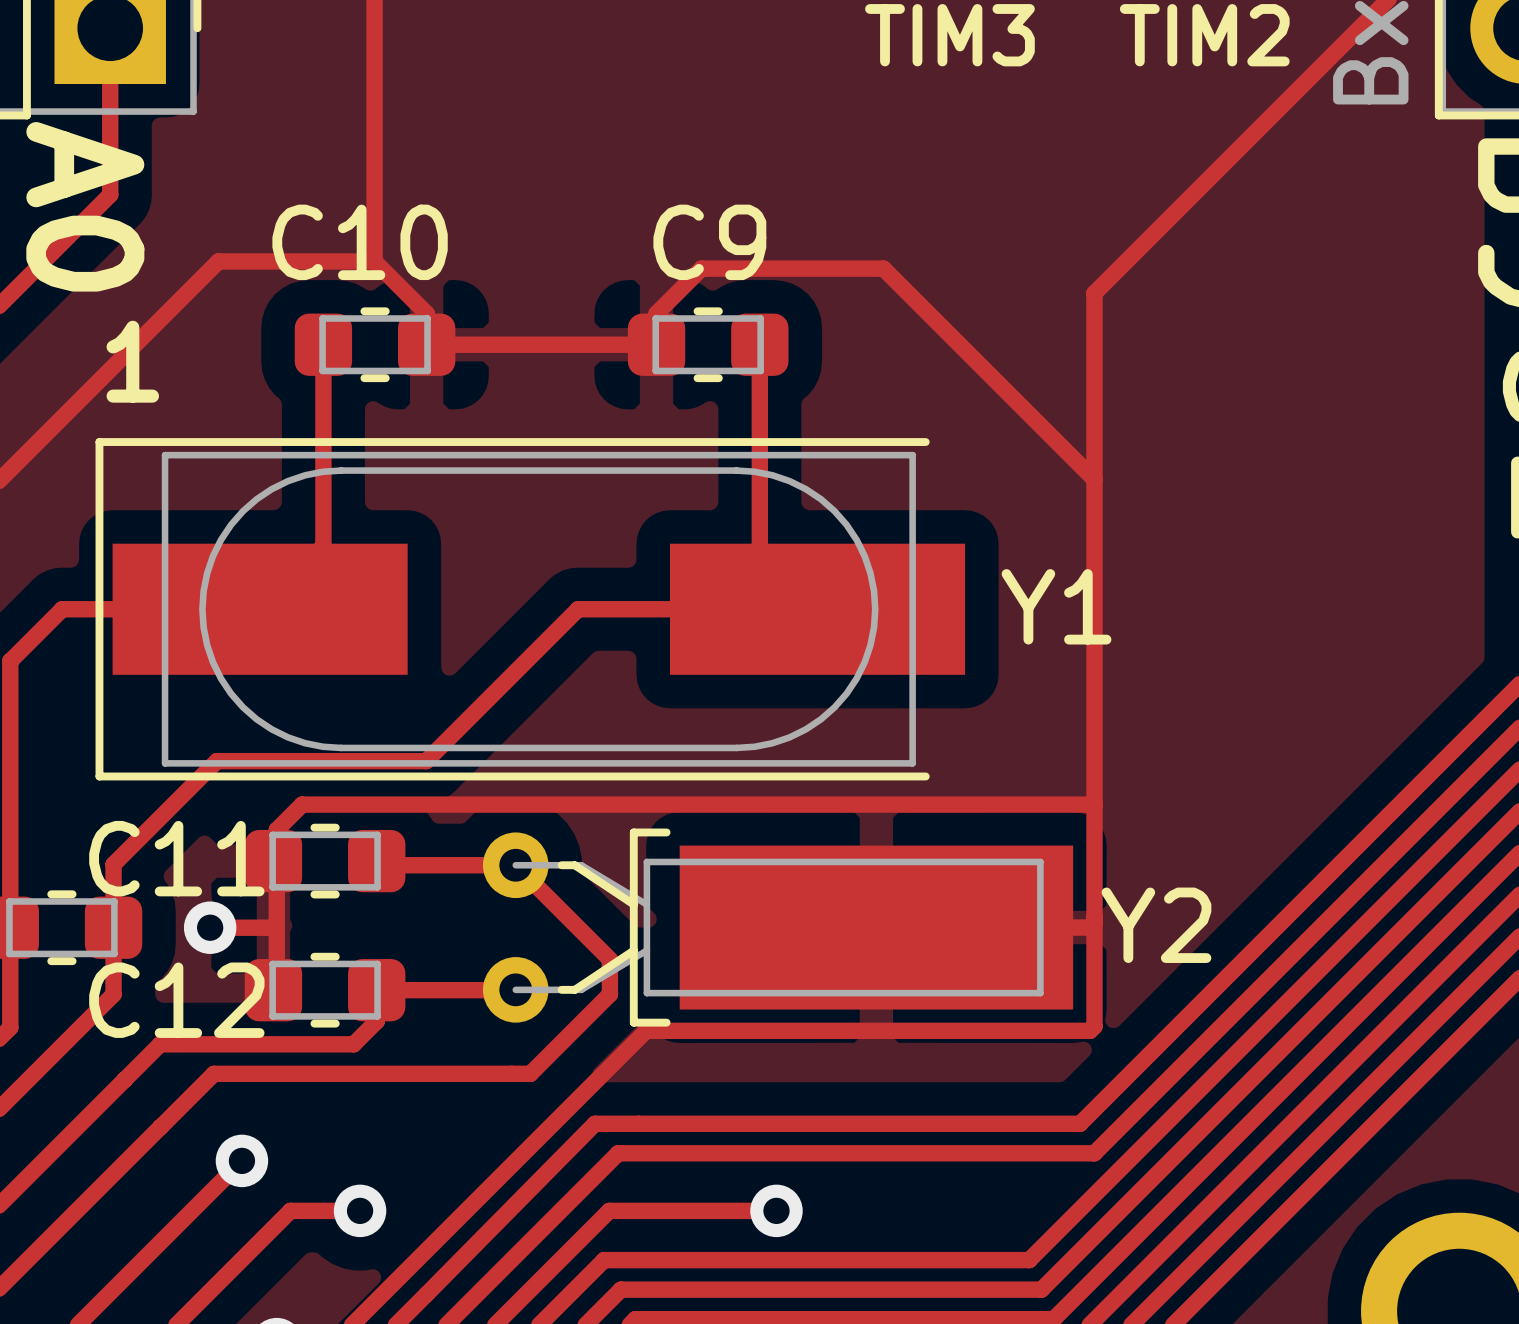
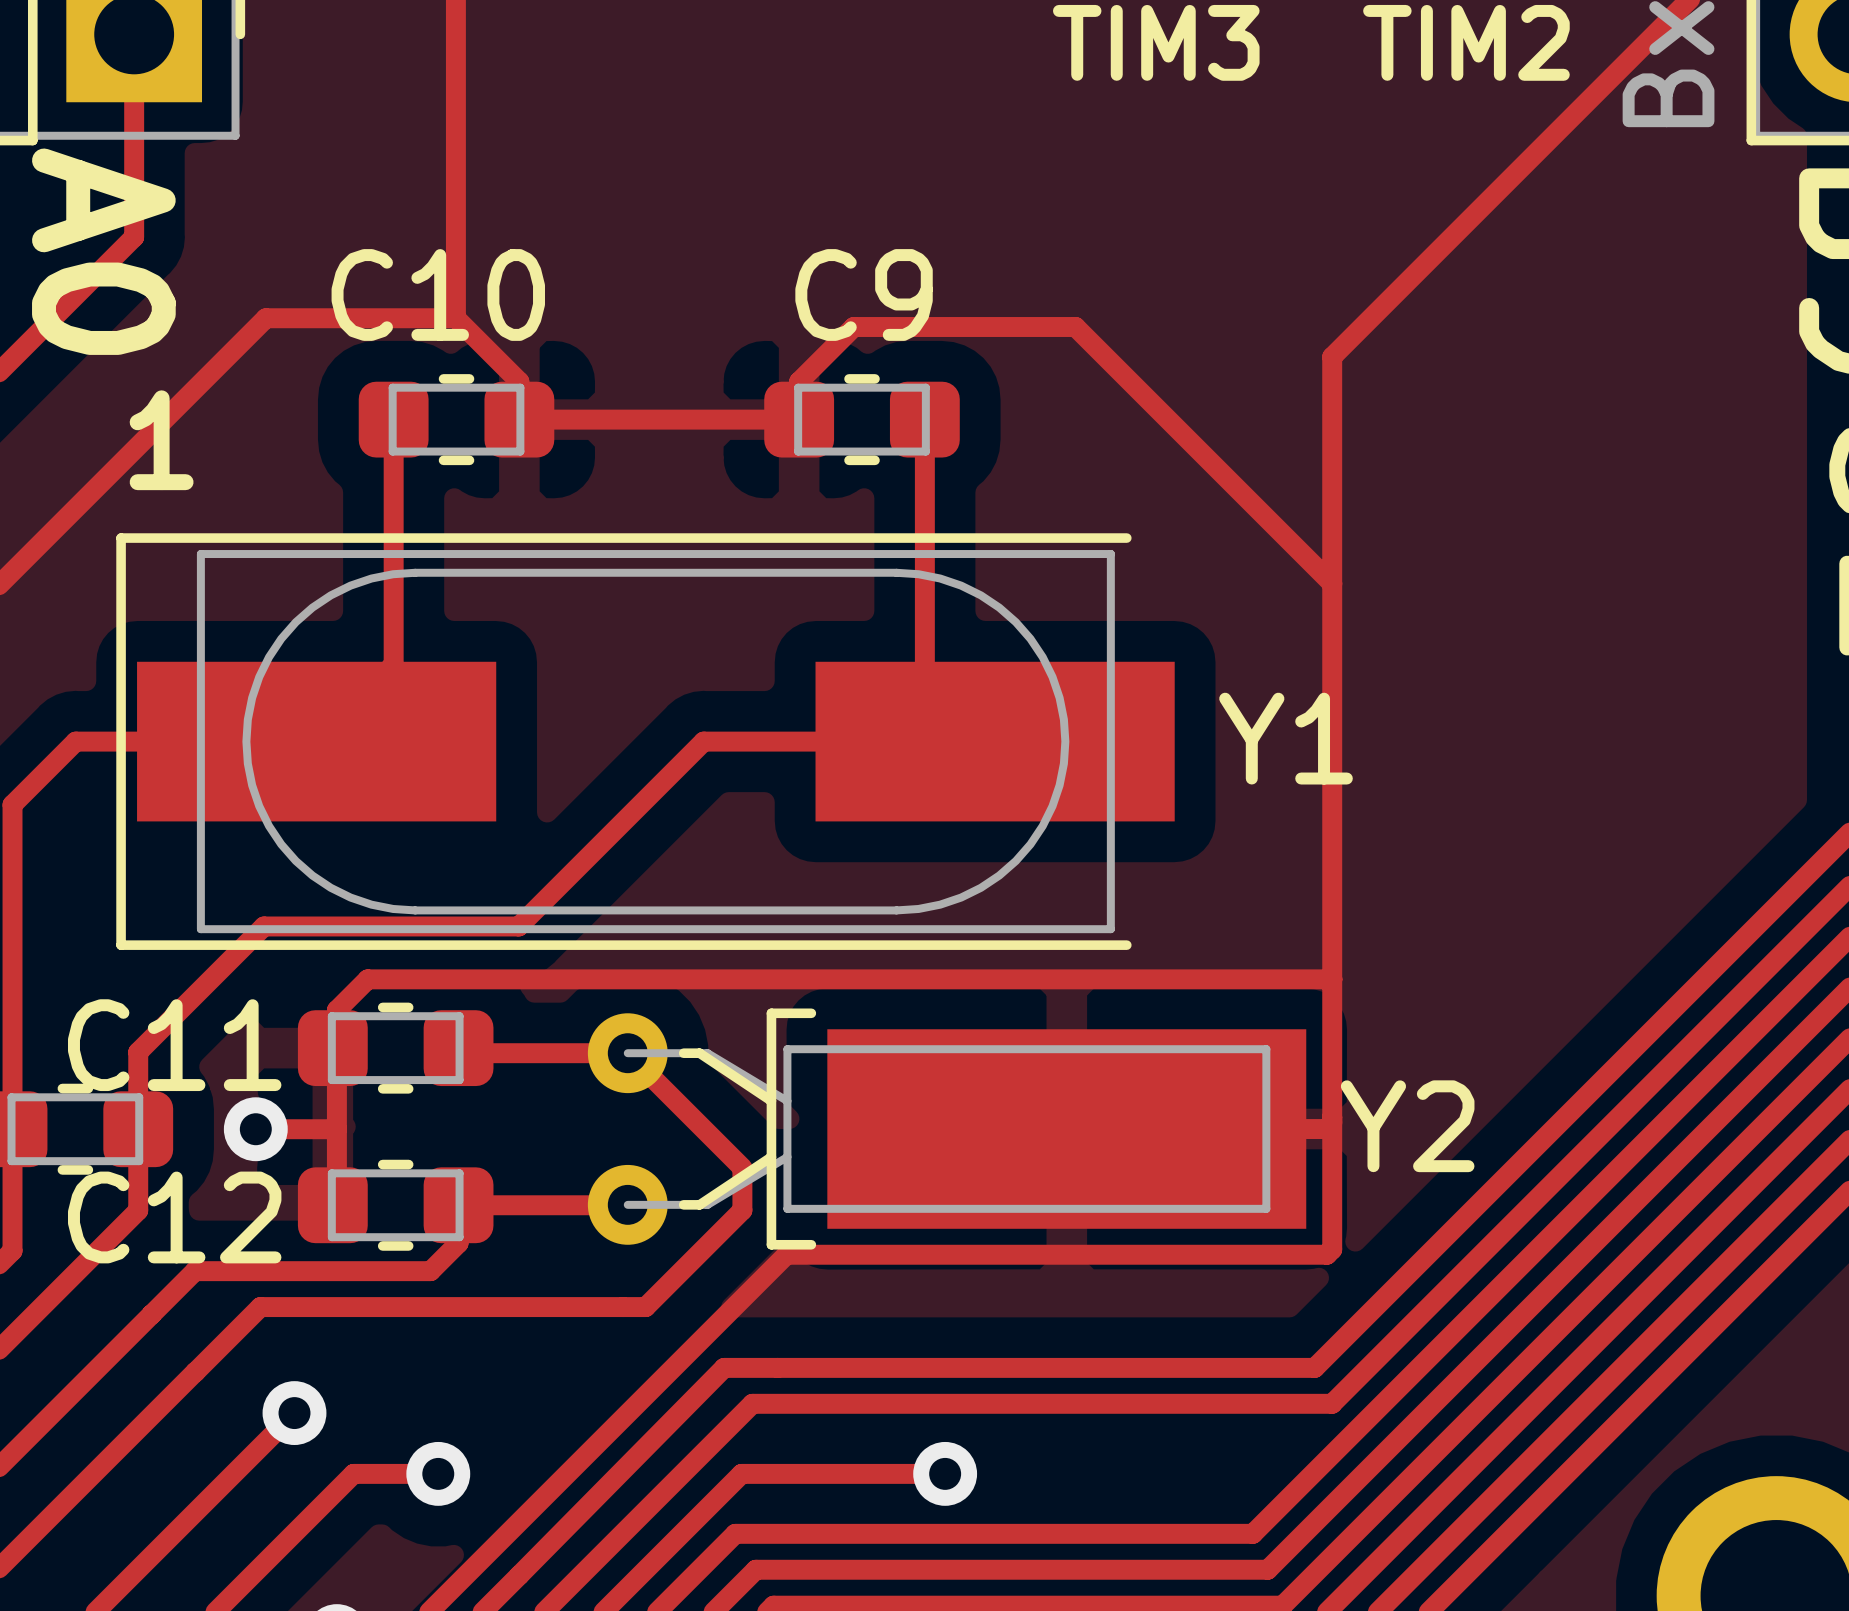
C11 name position: C11 (176, 858) -> C11 (174, 1045)
C12 name position: C12 (176, 1000) -> C12 (174, 1217)

